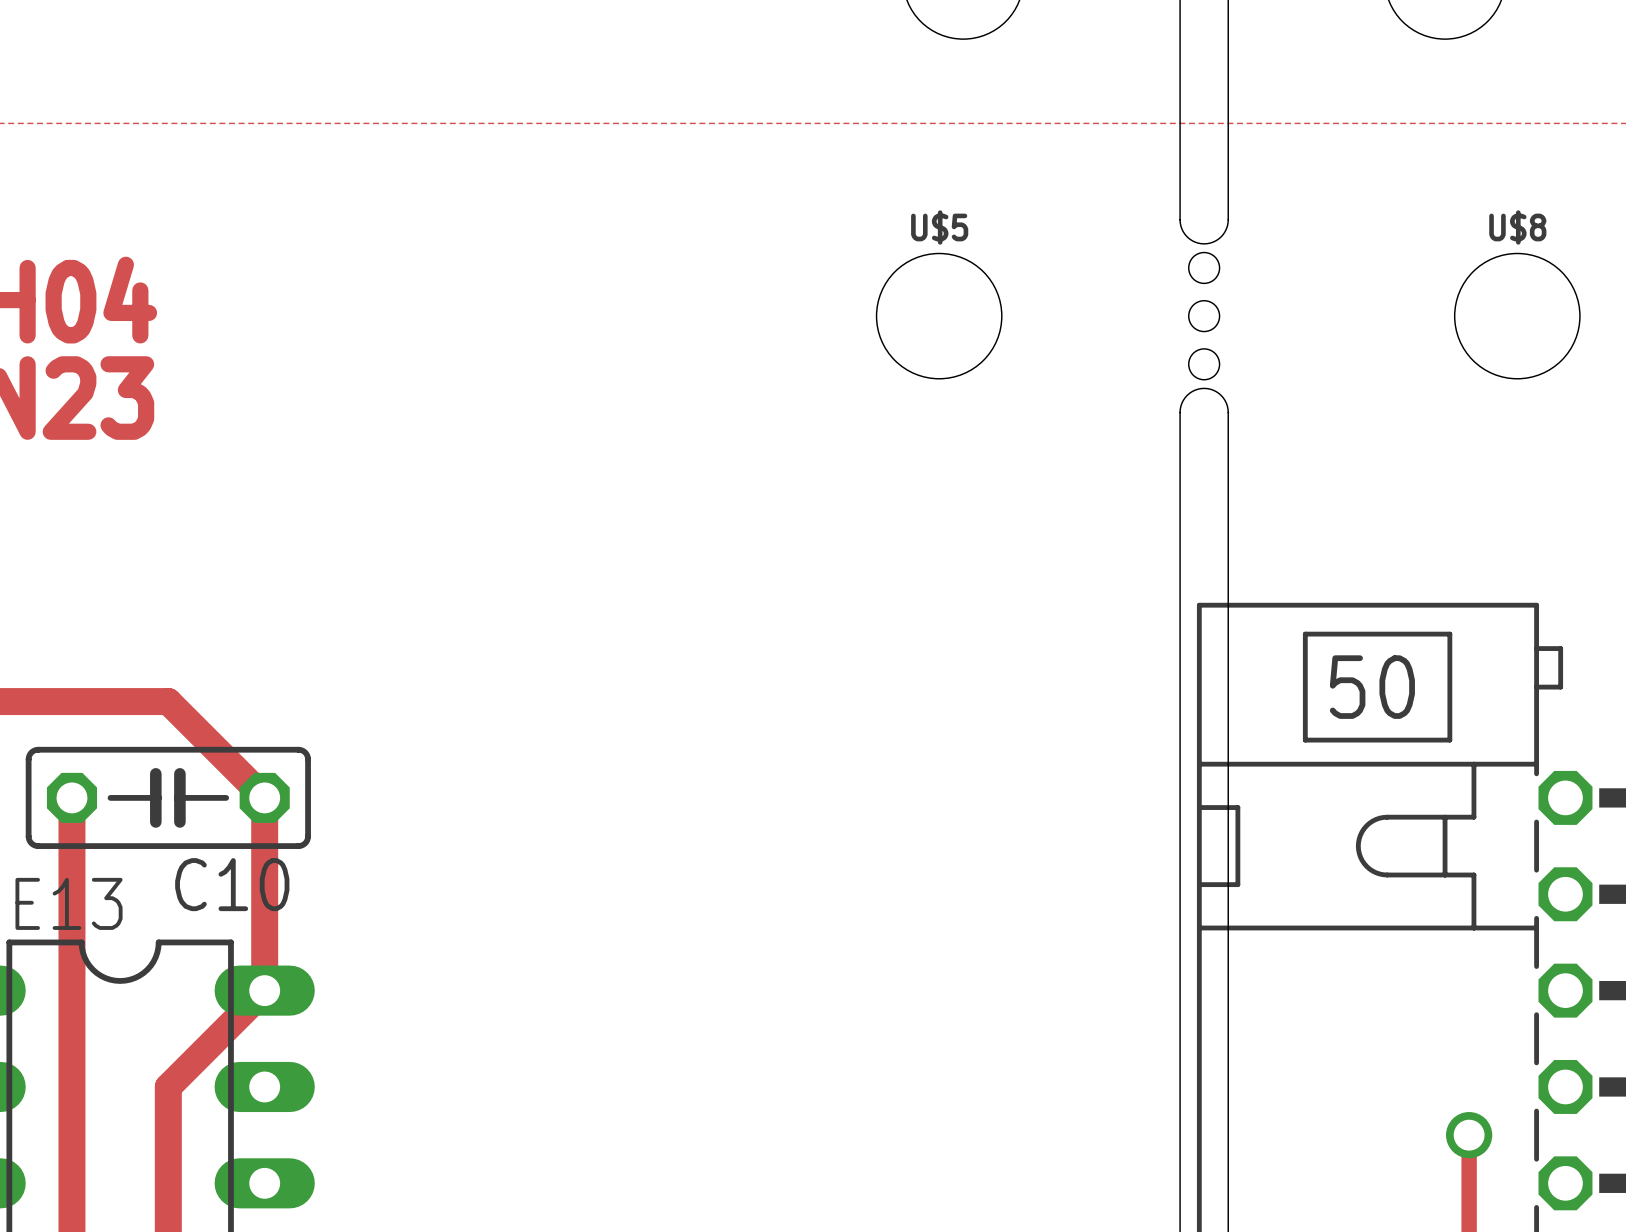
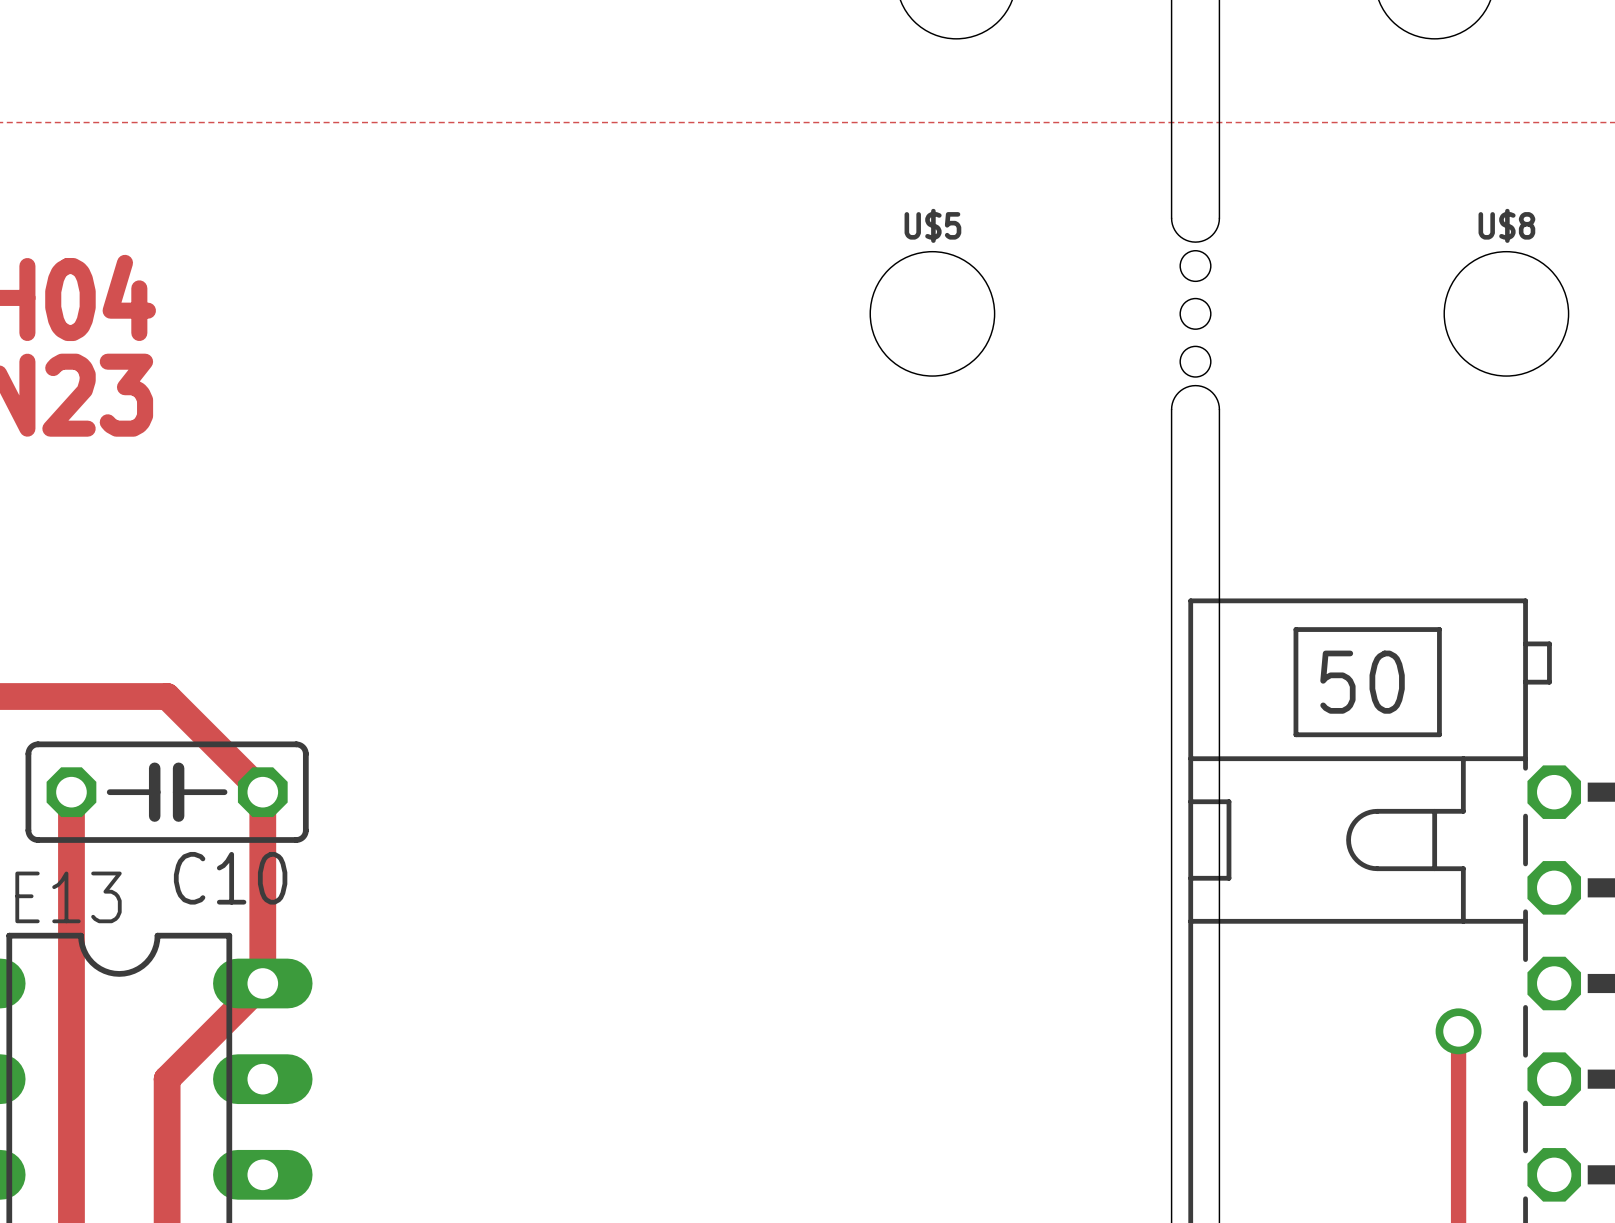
track: none -> (1458, 1031) (1458, 1126)
via position: (1469, 1135) -> (1458, 1031)

